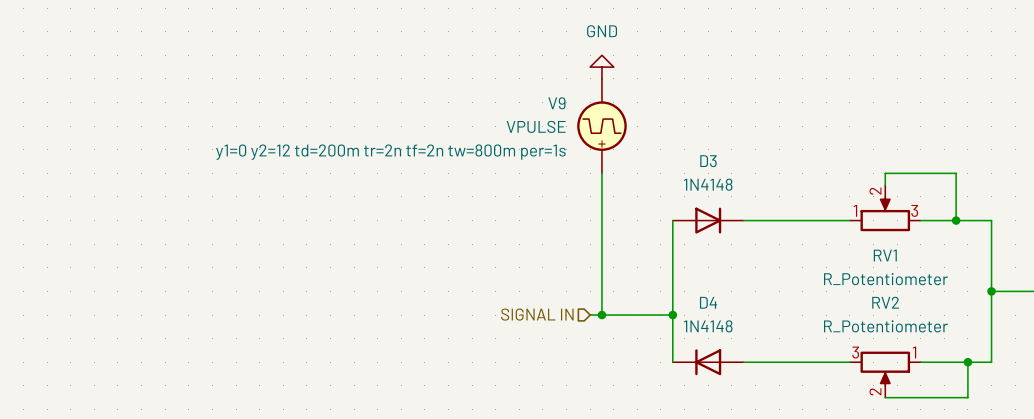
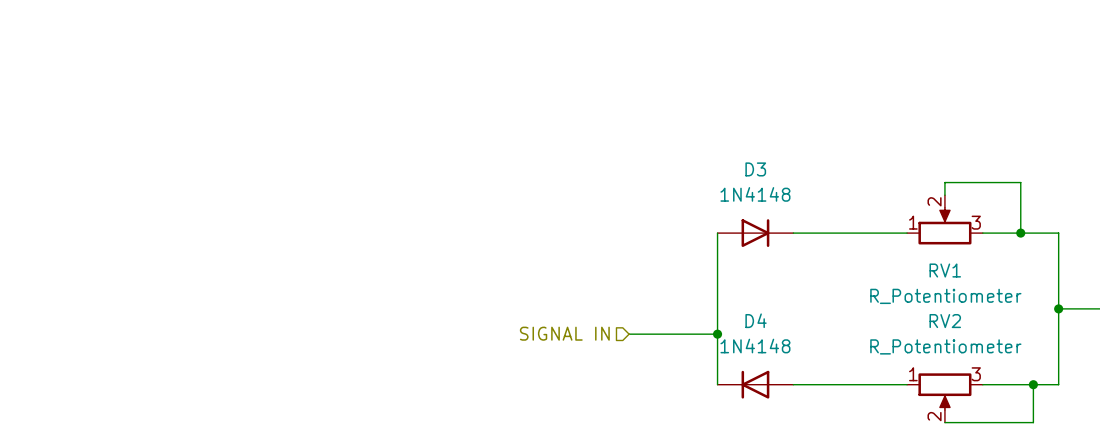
power symbol: GND (601, 67) -> none
V9: VPULSE (601, 126) -> none
wire: (601, 173) (601, 315) -> none
junction: (601, 315) -> none
RV2 flip: as is (885, 368) -> left-right (944, 391)

